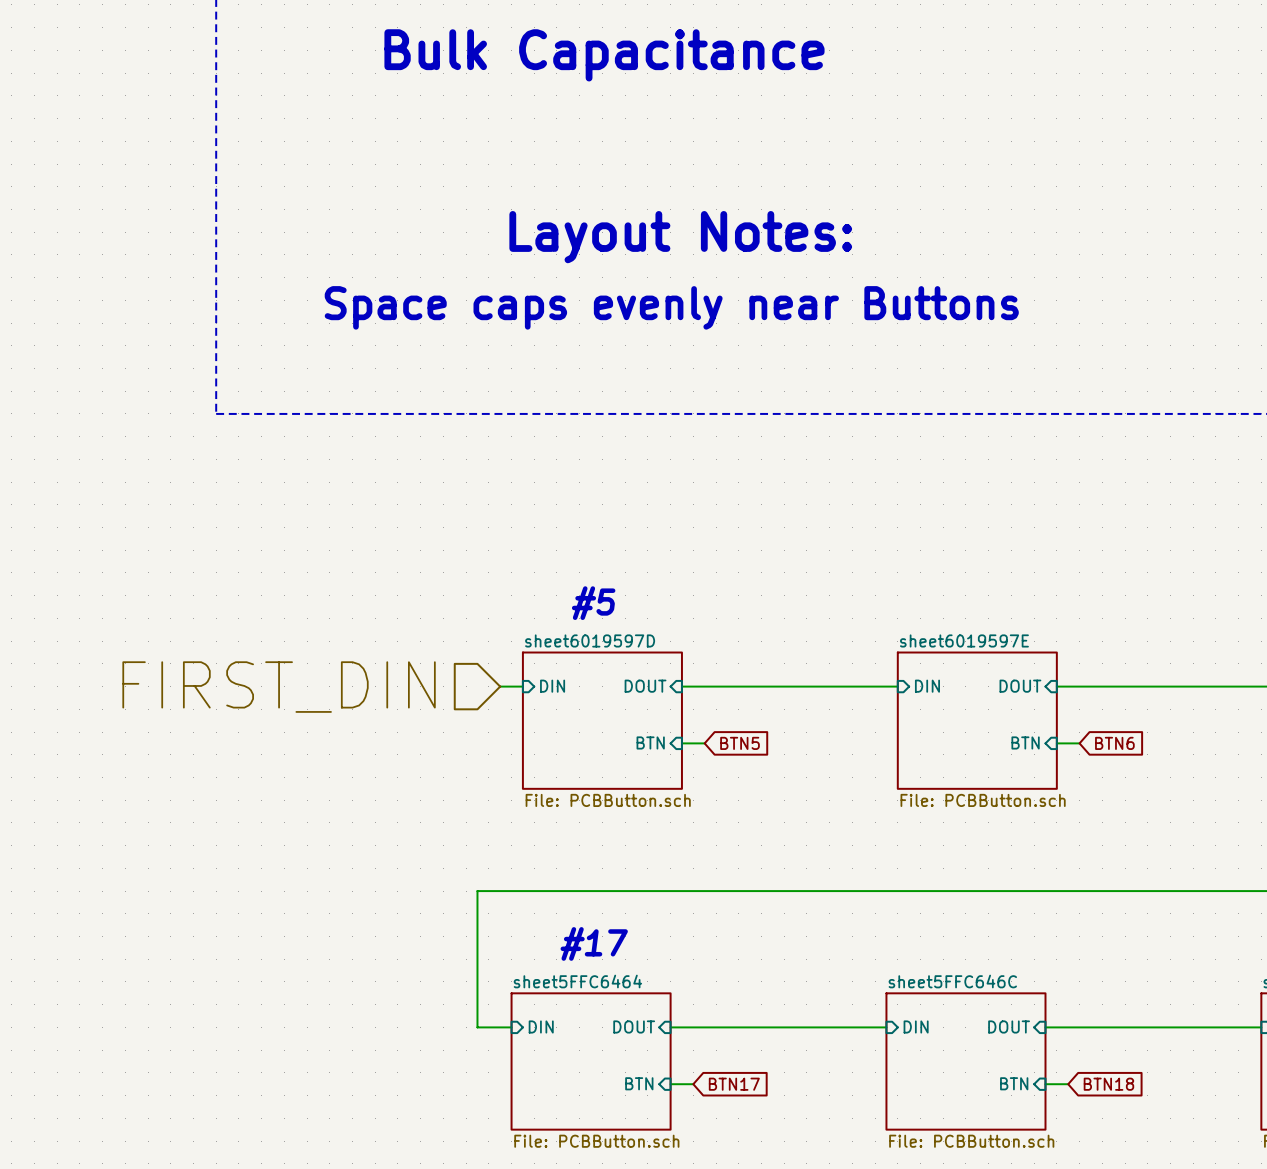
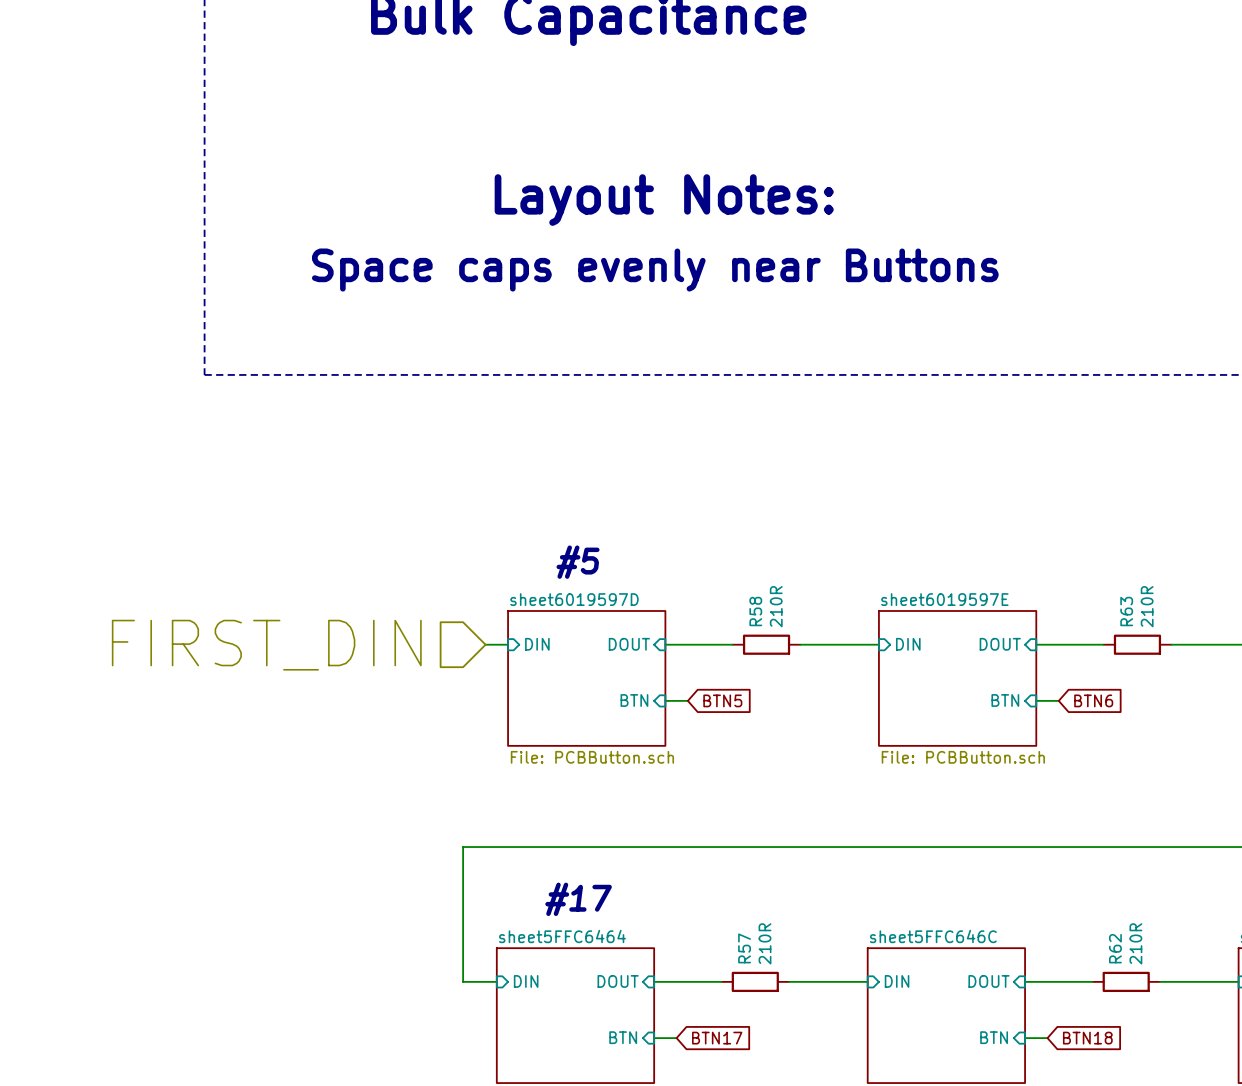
wire: (750, 686) (818, 686) -> none
R58: none -> 210R (766, 644)
wire: (1125, 686) (1193, 686) -> none
R63: none -> 210R (1137, 644)
wire: (738, 1027) (806, 1027) -> none
R57: none -> 210R (755, 981)
wire: (1113, 1027) (1181, 1027) -> none
R62: none -> 210R (1126, 981)

